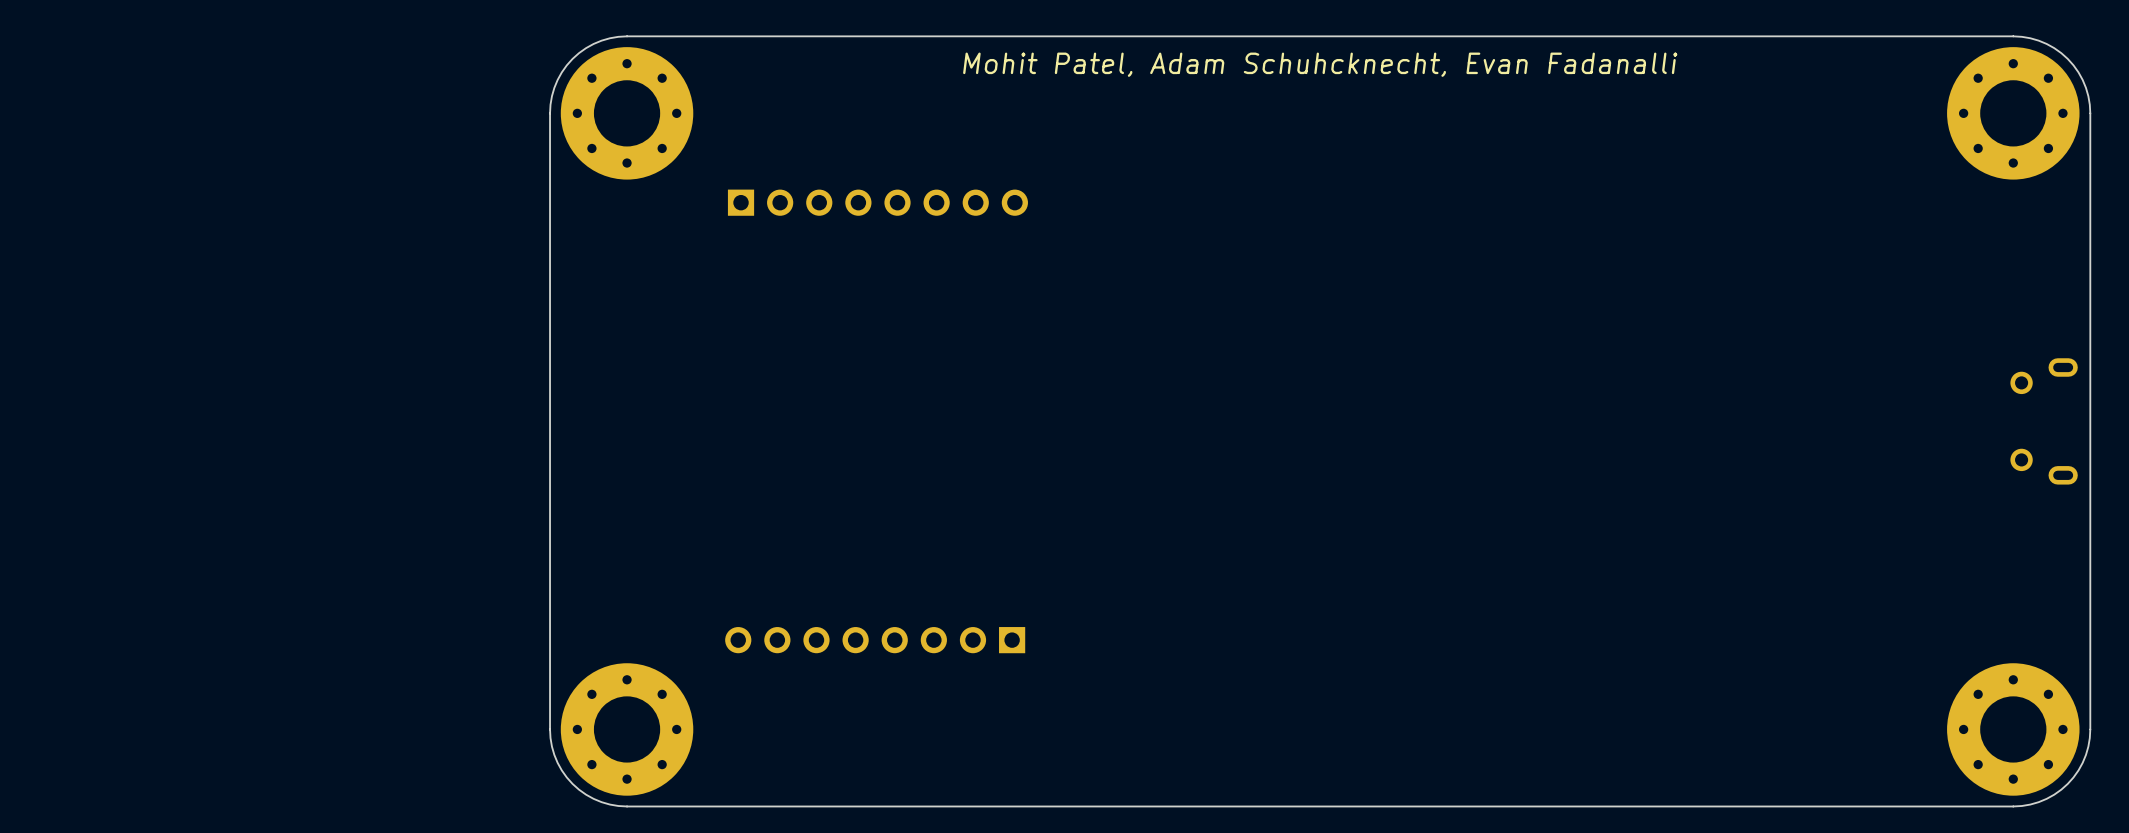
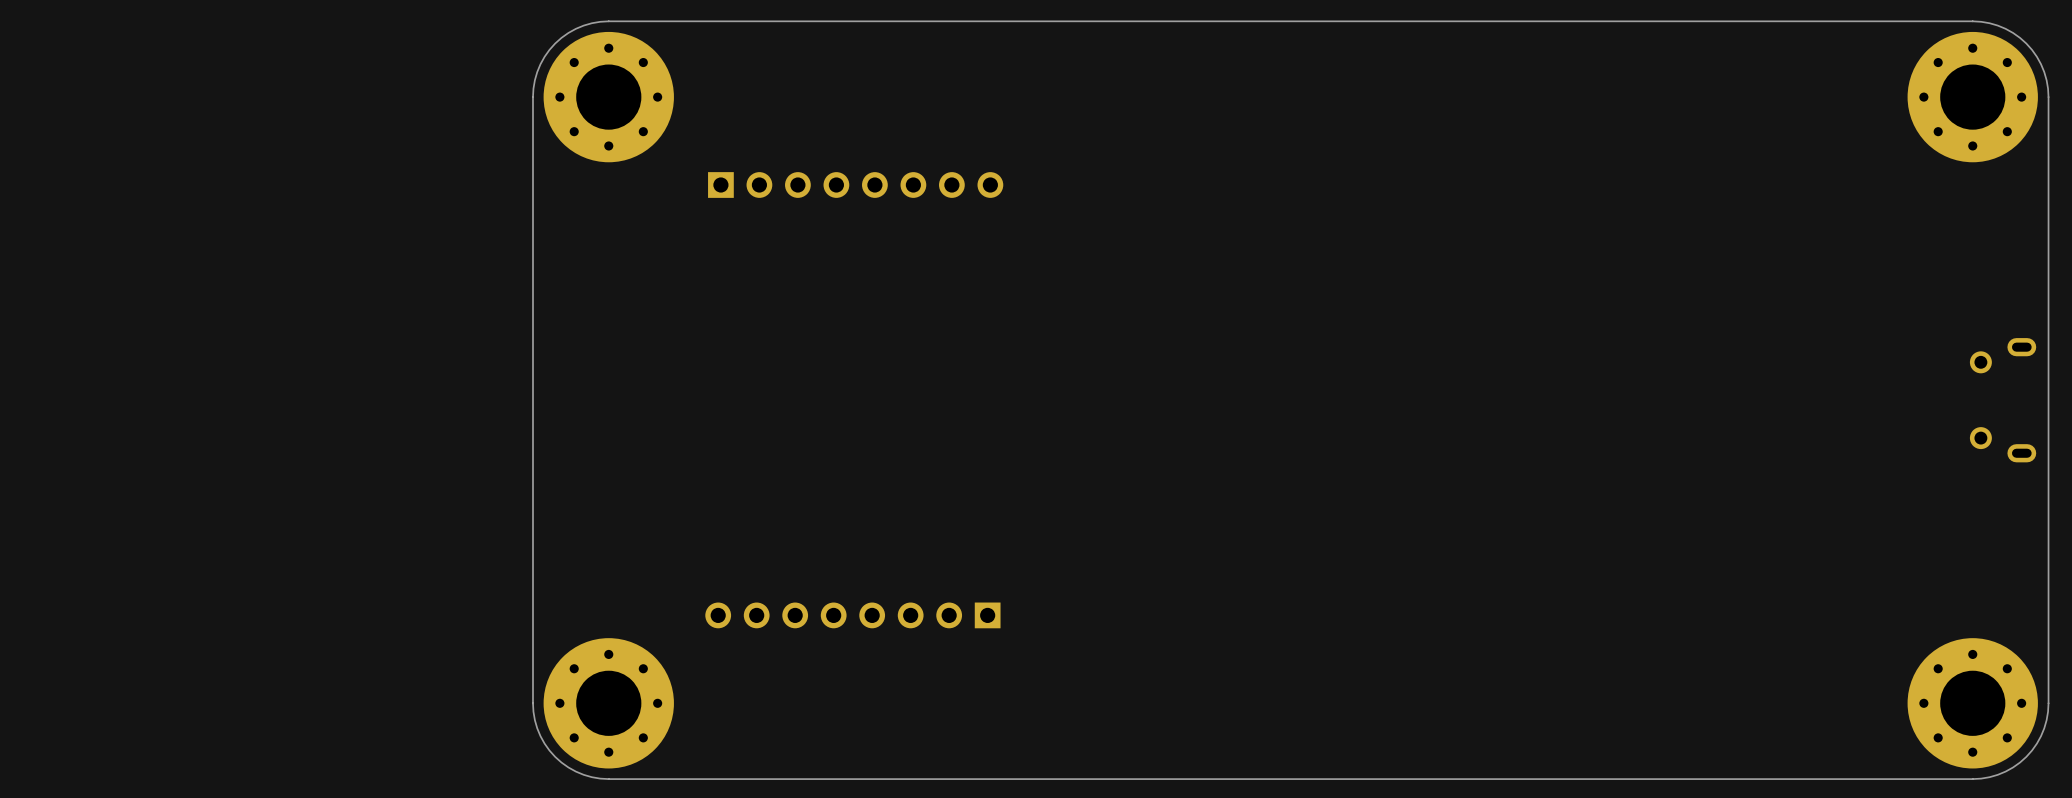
text: Mohit Patel, Adam Schuhcknecht, Evan Fadanalli (1320, 64) -> none

